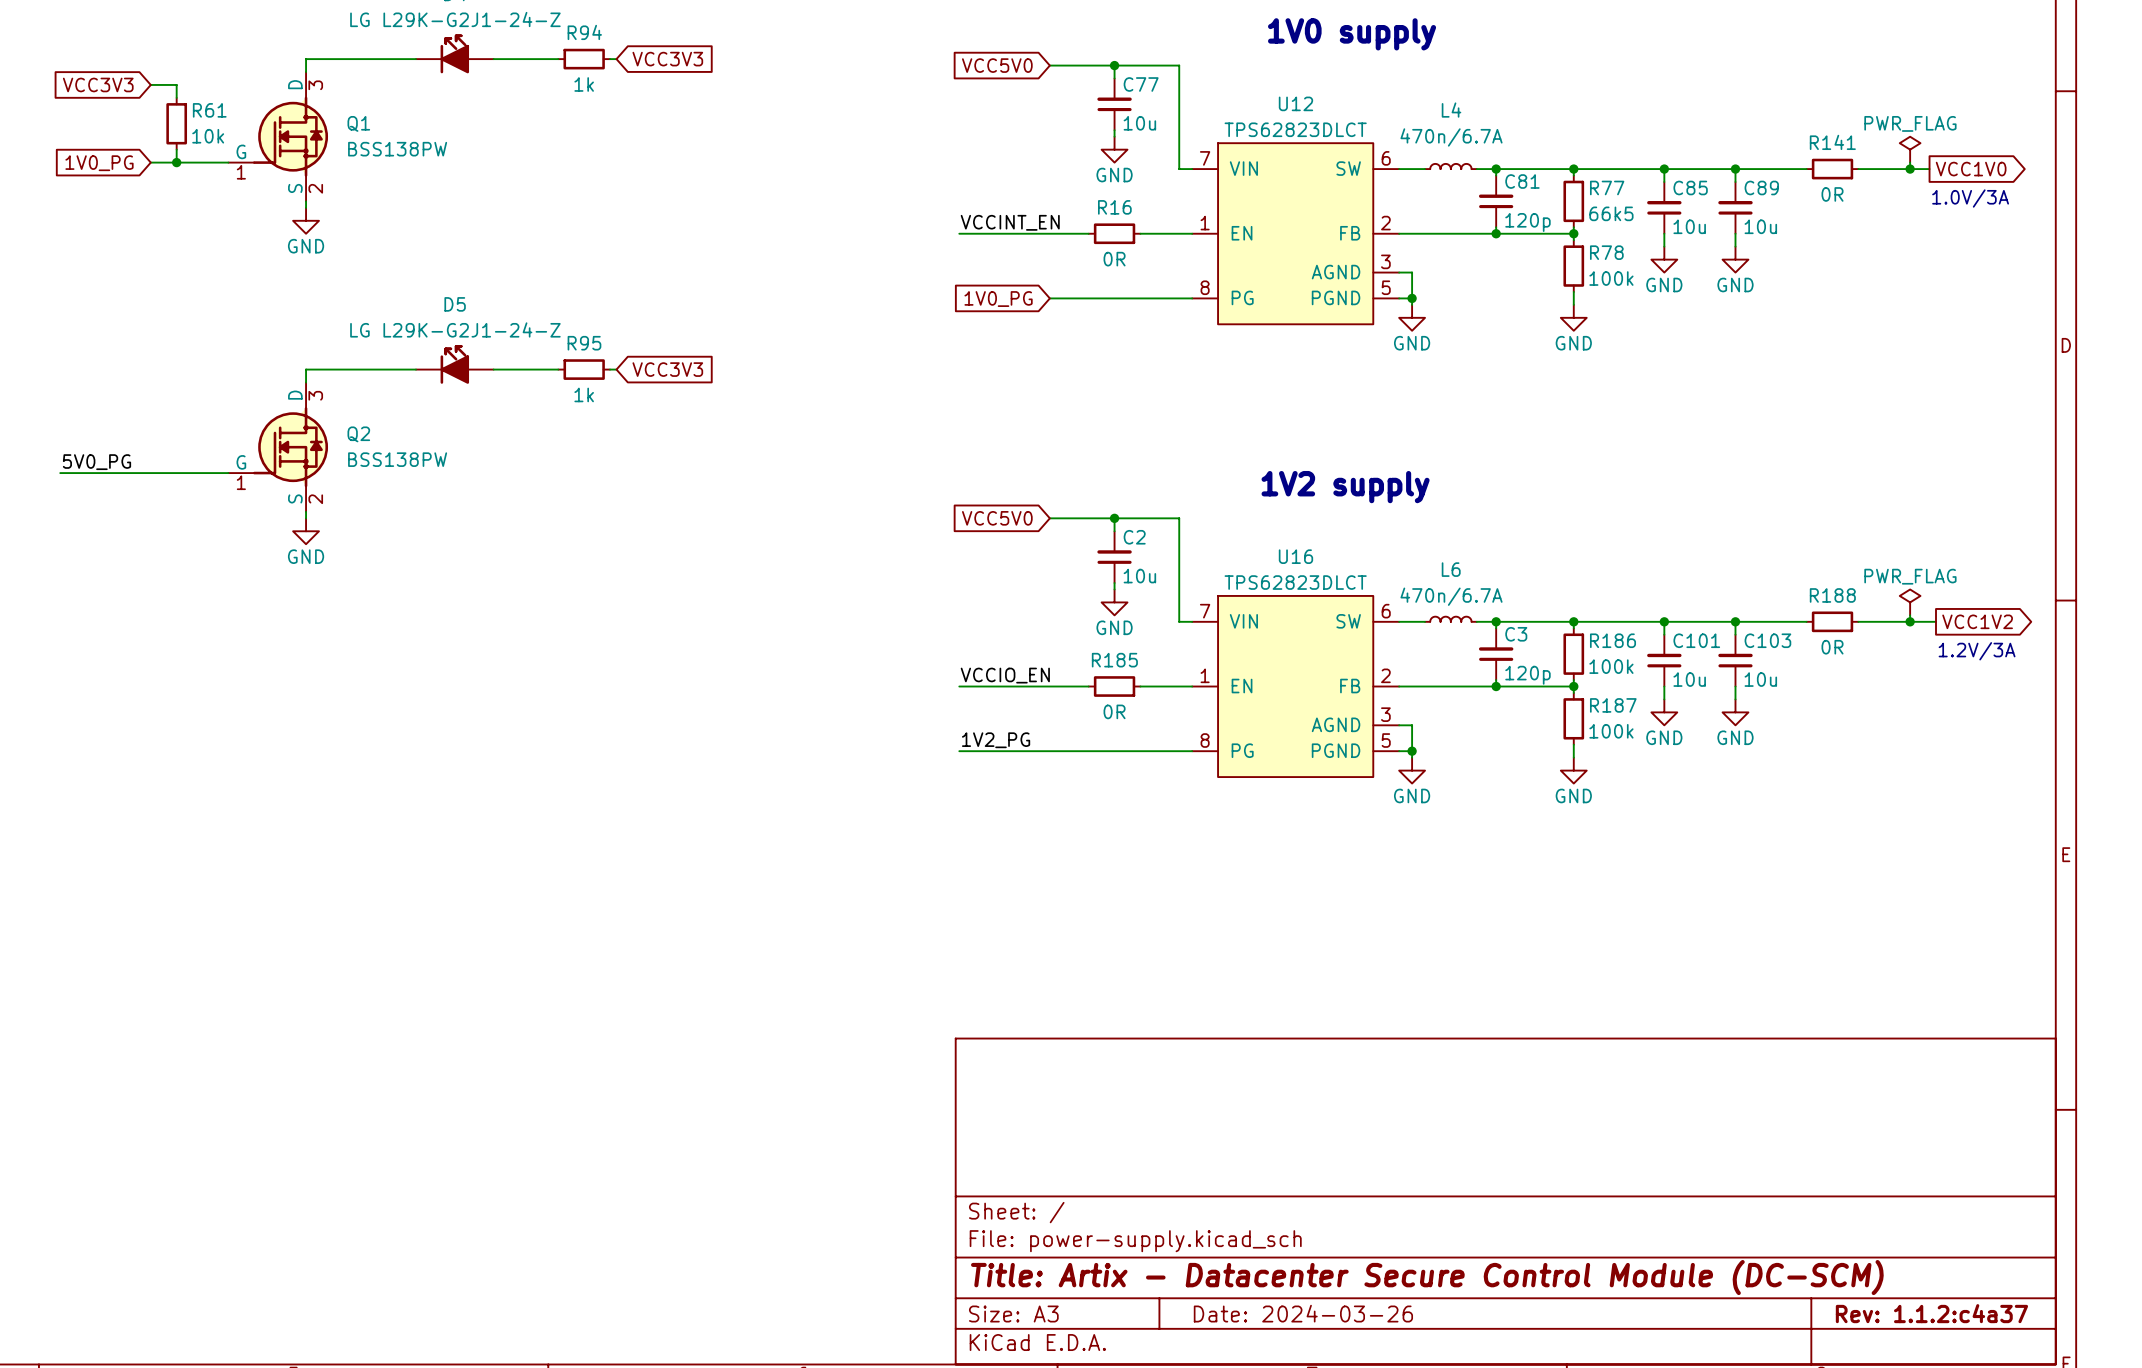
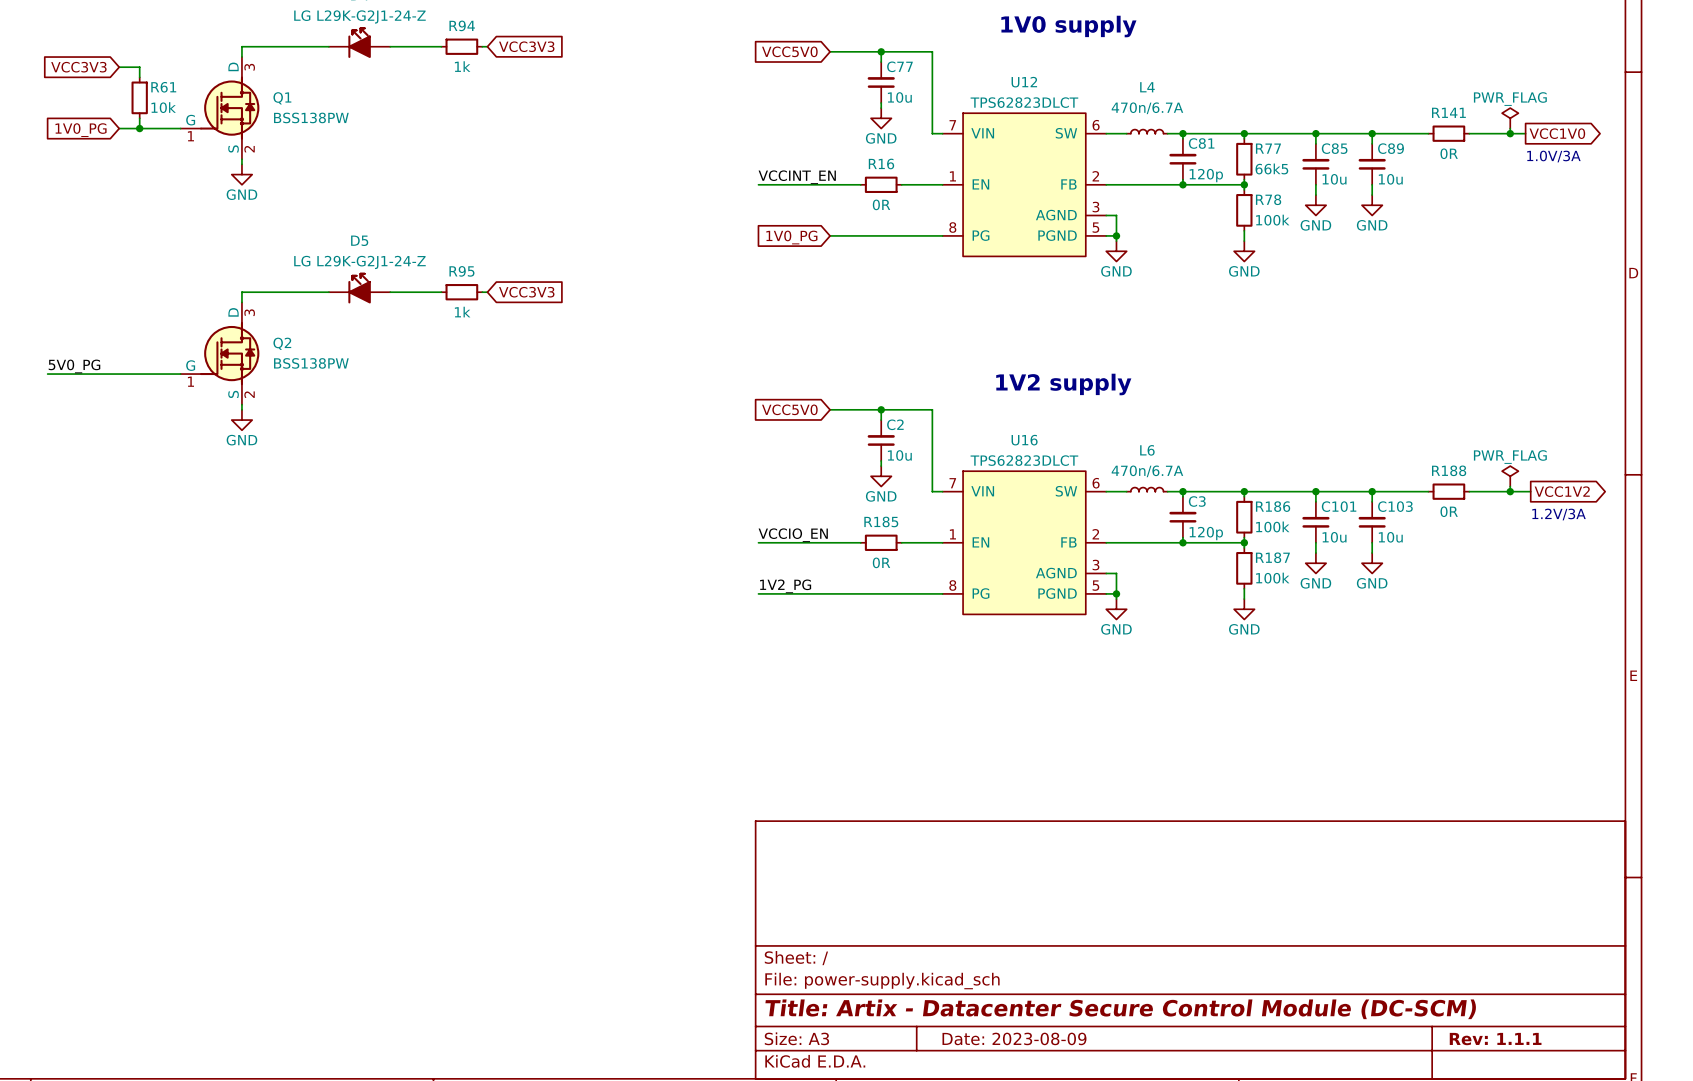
title block: Date: 2024-03-26 (1303, 1313) -> Date: 2023-08-09 (1014, 1038)
title block: Rev: 1.1.2:c4a37 (1931, 1313) -> Rev: 1.1.1 (1495, 1039)

